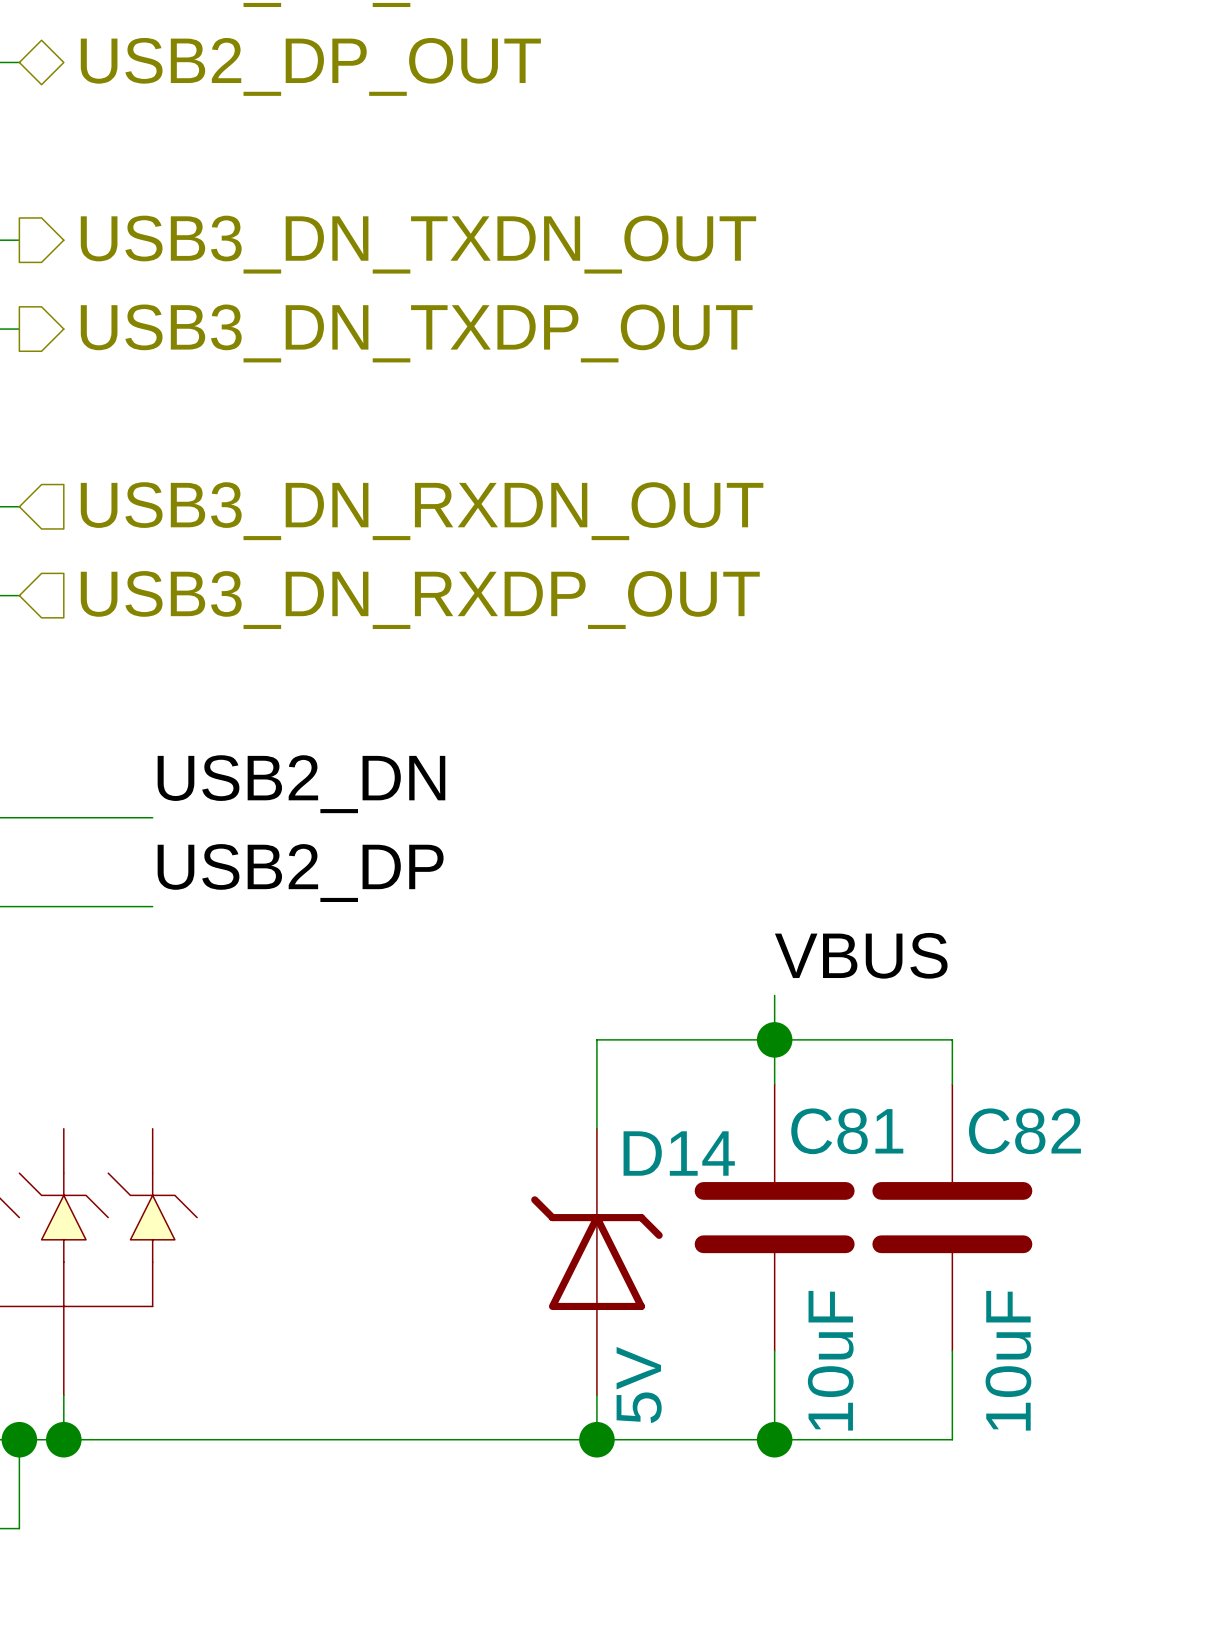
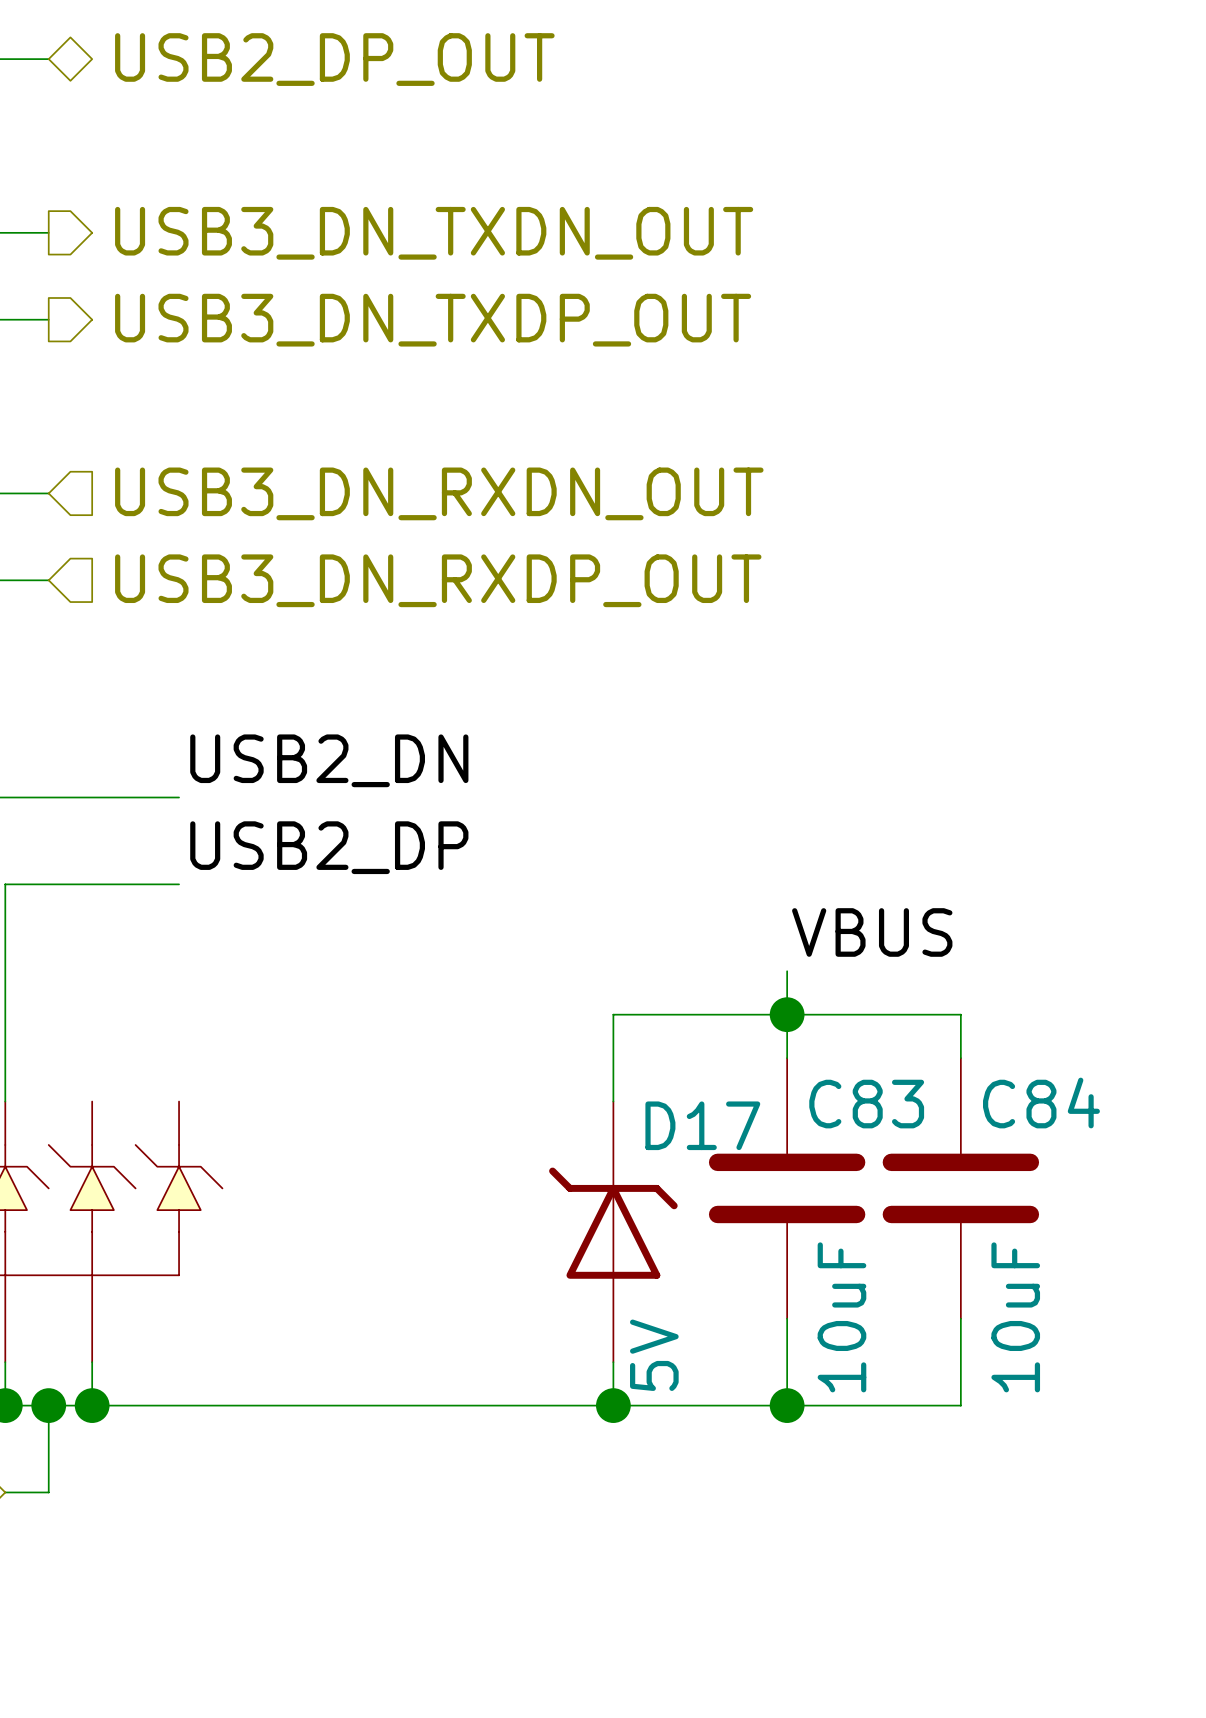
C81 name: C81 (847, 1131) -> C83 (866, 1104)
C82 name: C82 (1024, 1131) -> C84 (1041, 1103)
D14 name: D14 (679, 1153) -> D17 (702, 1125)

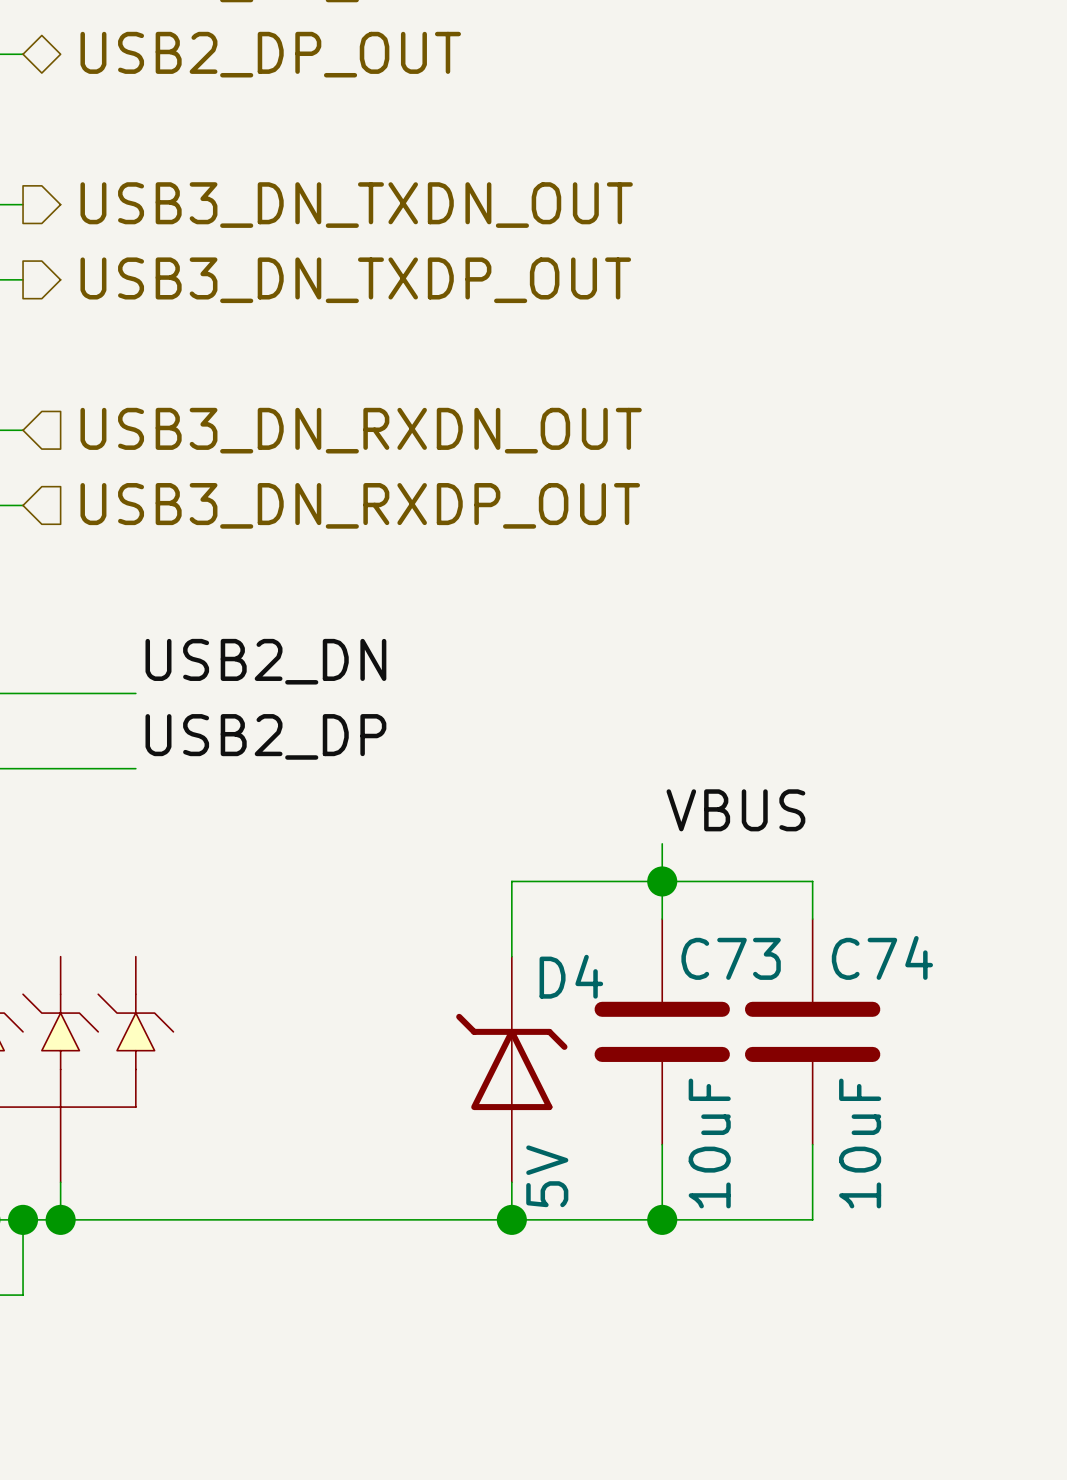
C84 name: C84 (1041, 1103) -> C74 (882, 957)
C83 name: C83 (866, 1104) -> C73 (731, 958)
D17 name: D17 (702, 1125) -> D4 (571, 976)

